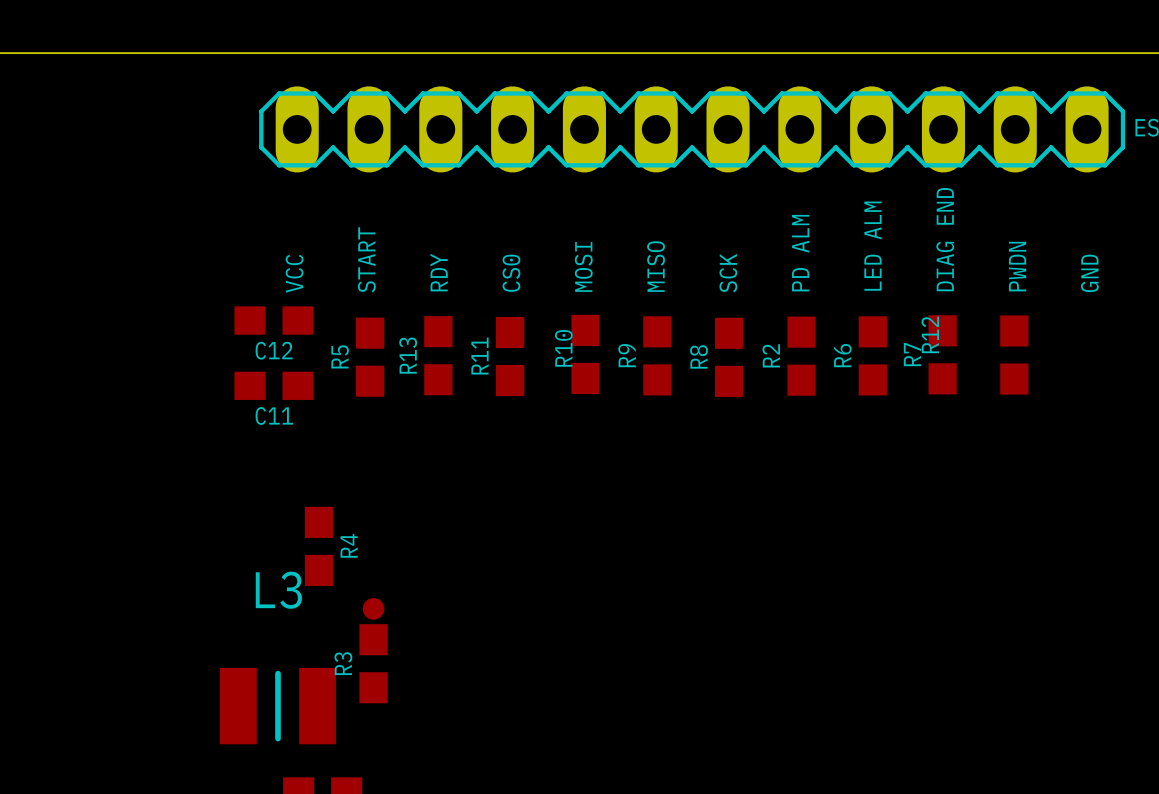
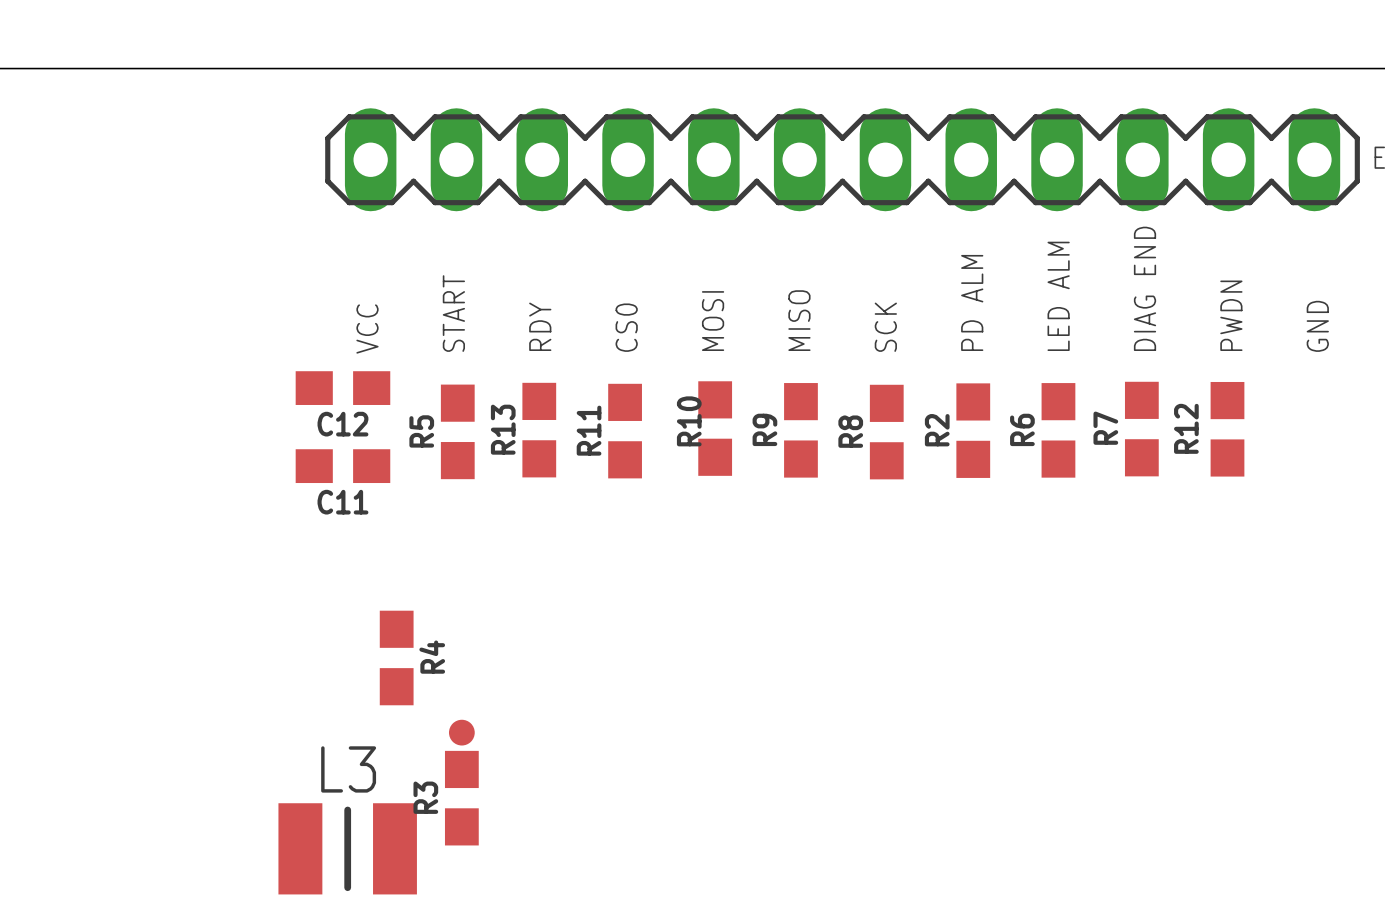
R12 name position: R12 (930, 334) -> R12 (1186, 428)
L3 name position: L3 (278, 590) -> L3 (348, 769)

